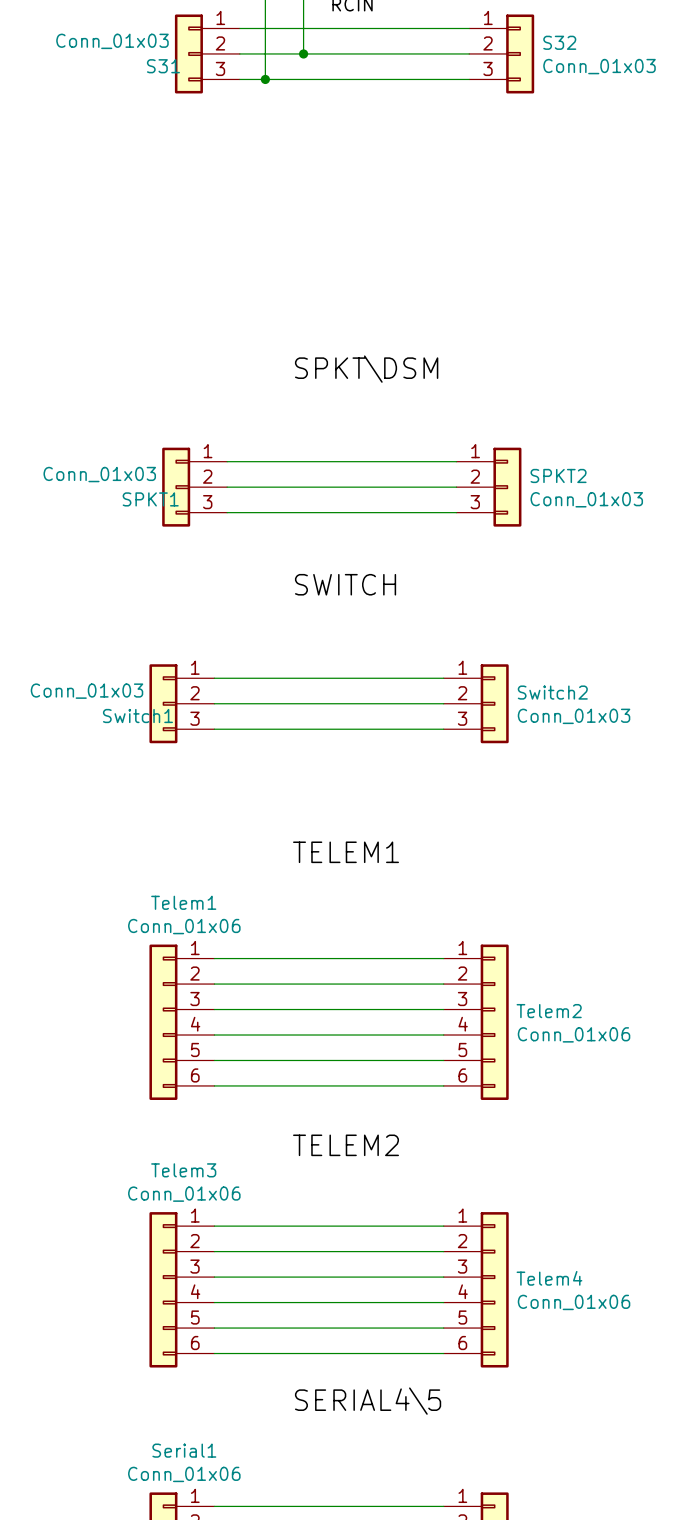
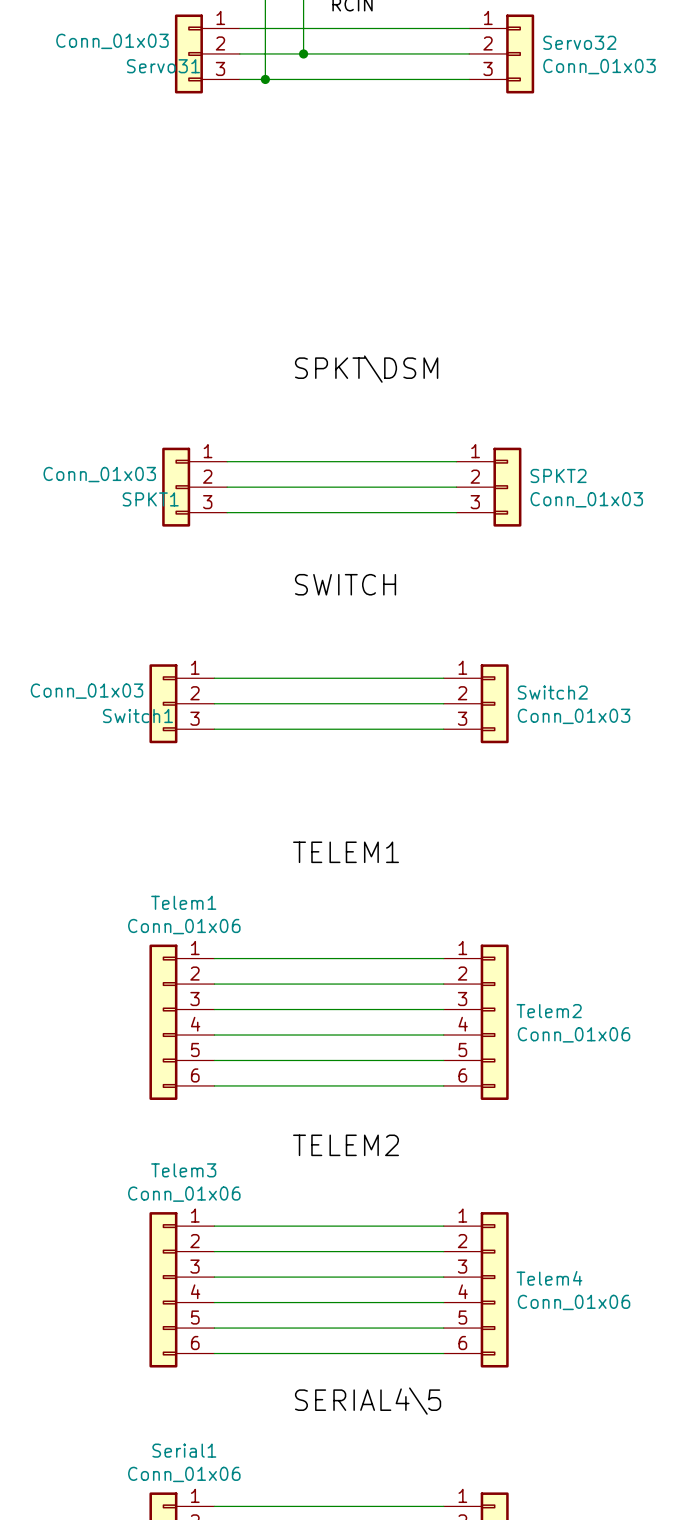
S32 name: S32 (559, 42) -> Servo32 (579, 42)
S31 name: S31 (163, 66) -> Servo31 (163, 66)

